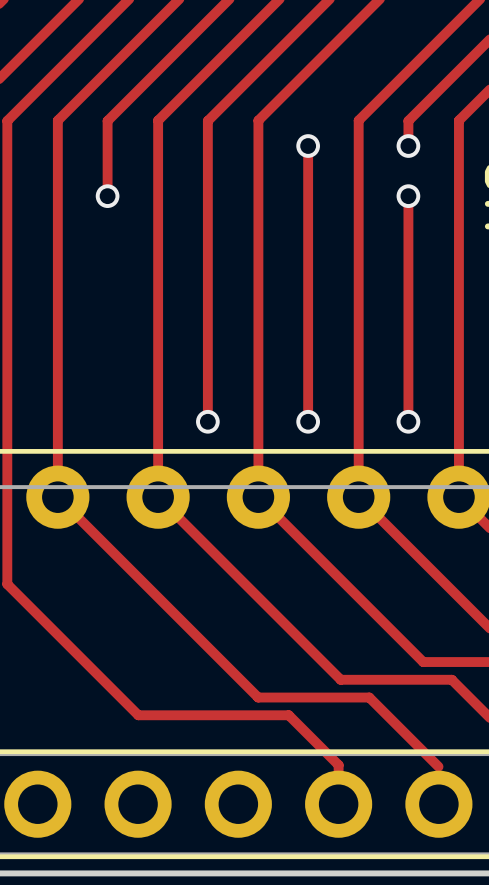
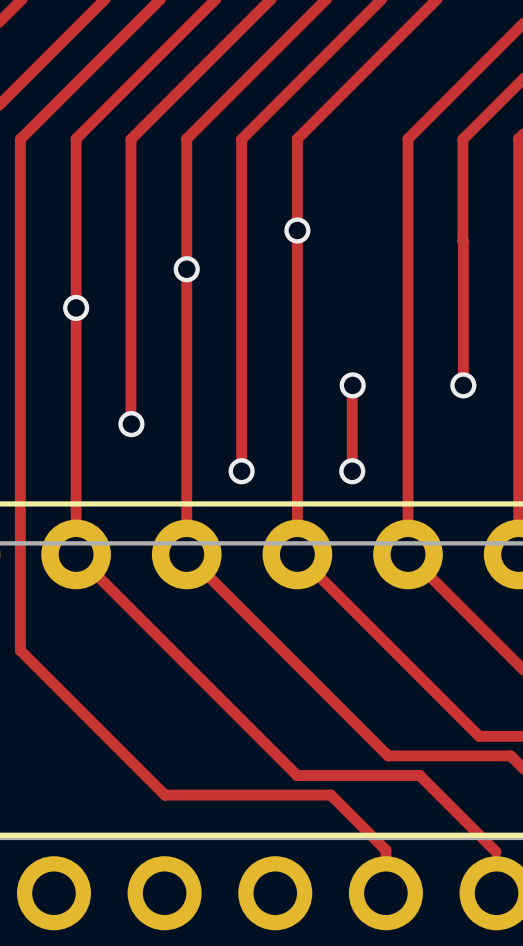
track: (308, 146) (308, 344) -> none
via: (308, 146) -> none
track: none -> (462, 166) (462, 222)
via: (408, 146) -> none
track: none -> (130, 222) (130, 423)
via: (107, 196) -> none
via: (408, 196) -> none
via: none -> (297, 230)
track: (408, 213) (408, 421) -> (463, 241) (463, 385)
via: none -> (186, 269)
via: none -> (76, 307)
via: none -> (352, 385)
via: none -> (463, 385)
via: none -> (131, 424)
via: (408, 421) -> none

